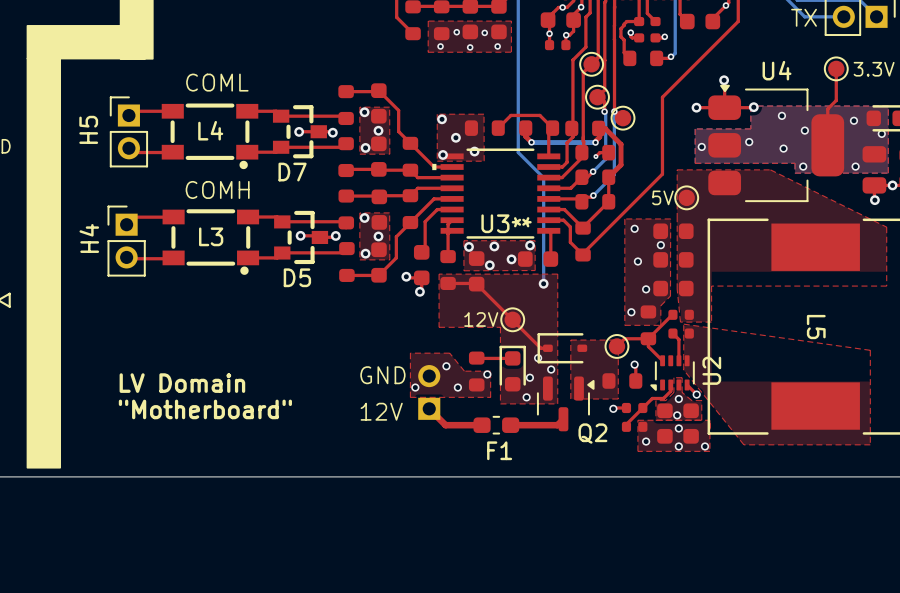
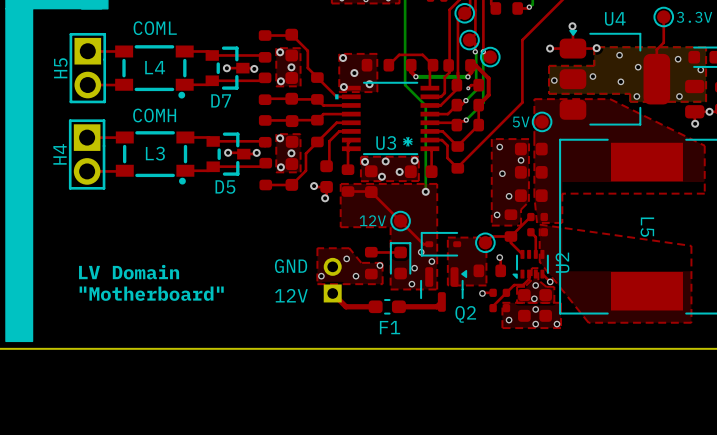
H5 footprint: [109, 96, 149, 168] -> [69, 32, 107, 104]
H4 footprint: [107, 205, 146, 277] -> [68, 119, 106, 190]

